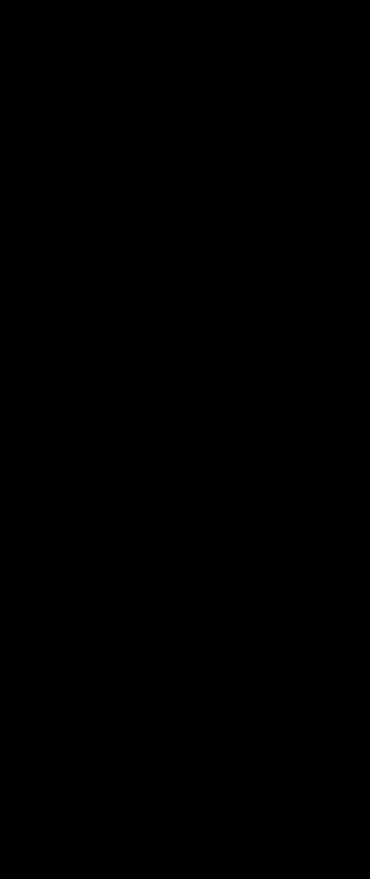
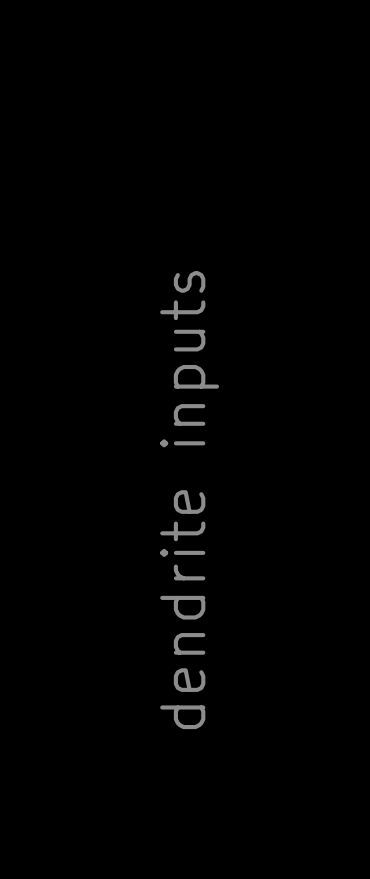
text: none -> dendrite inputs (189, 500)

